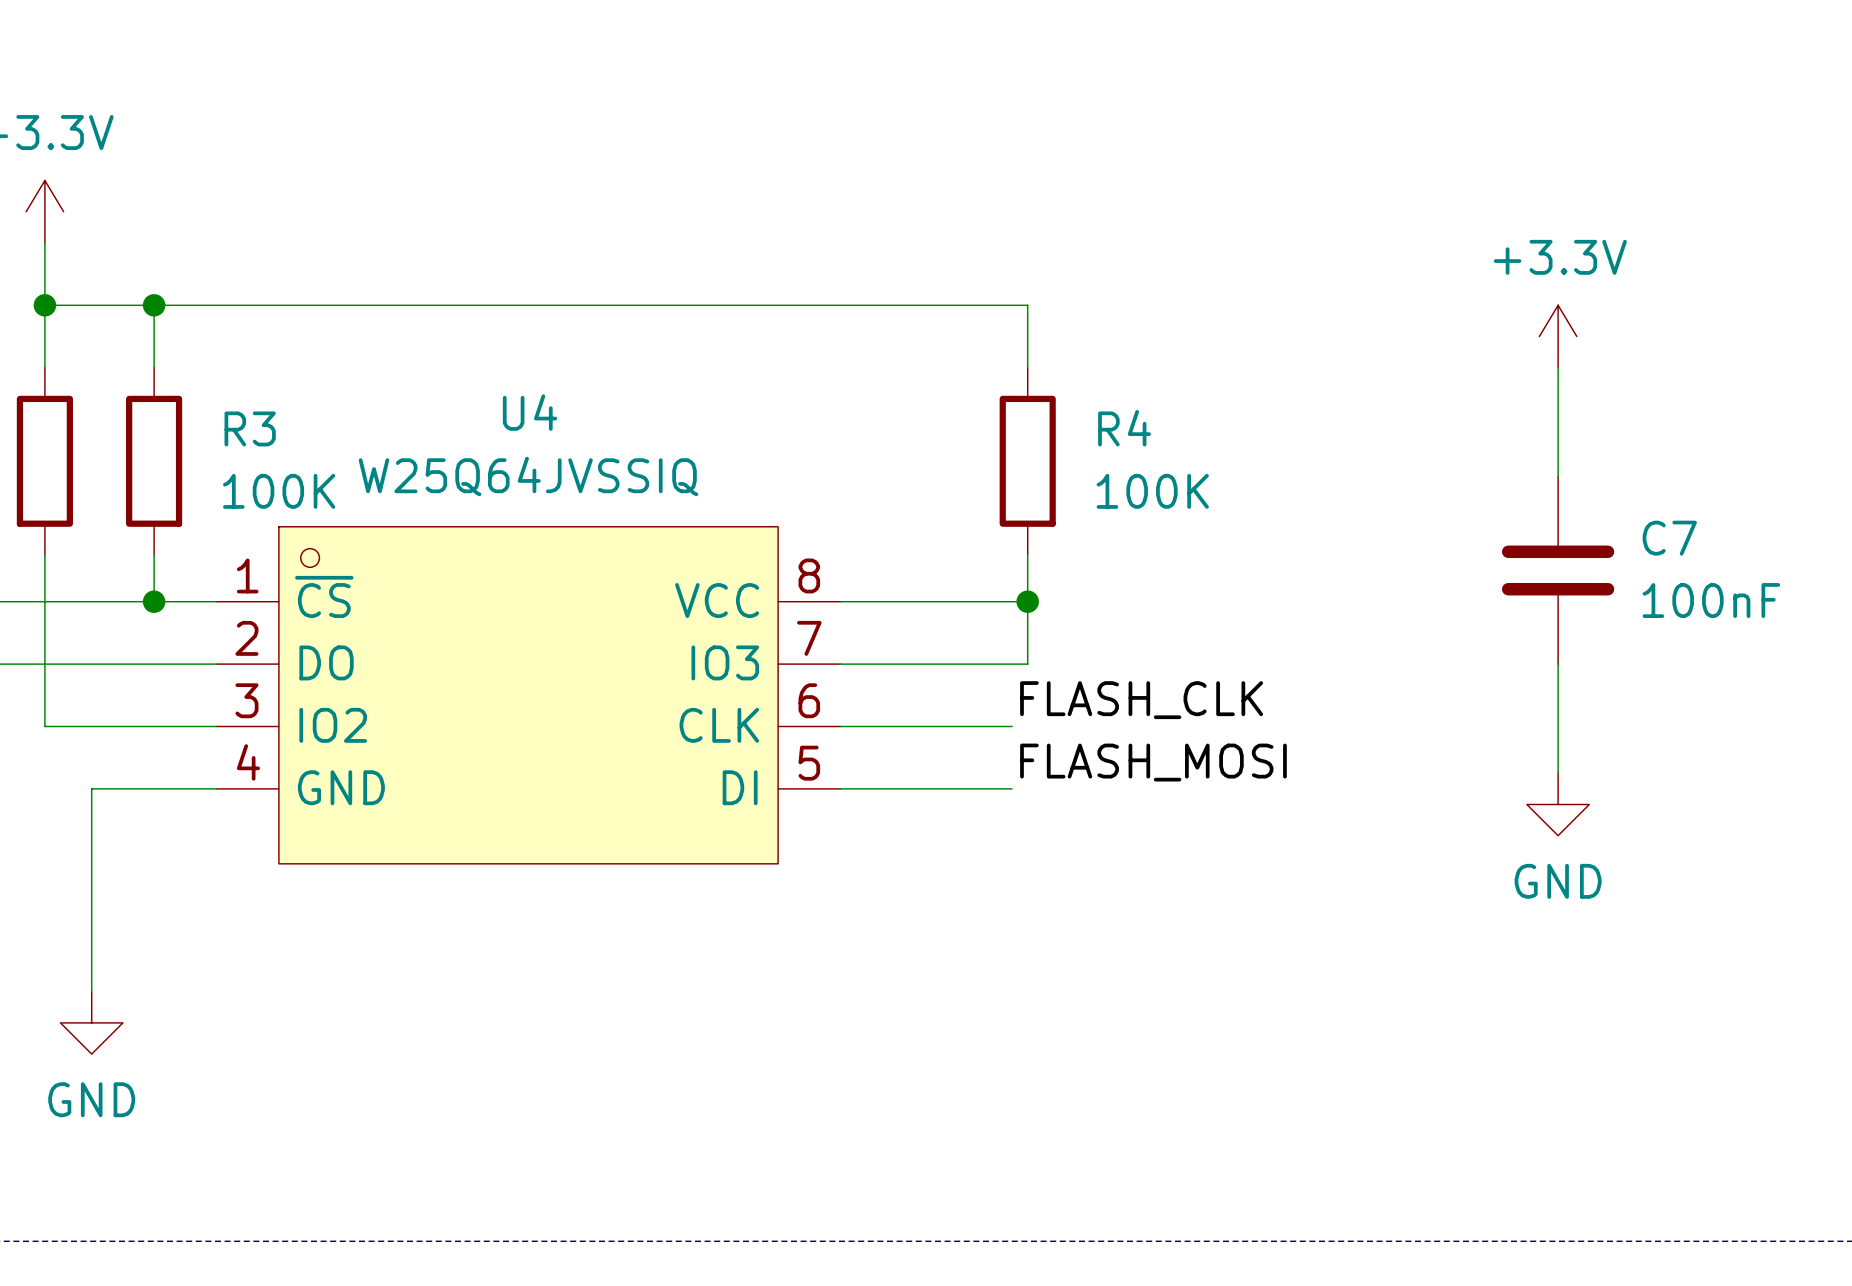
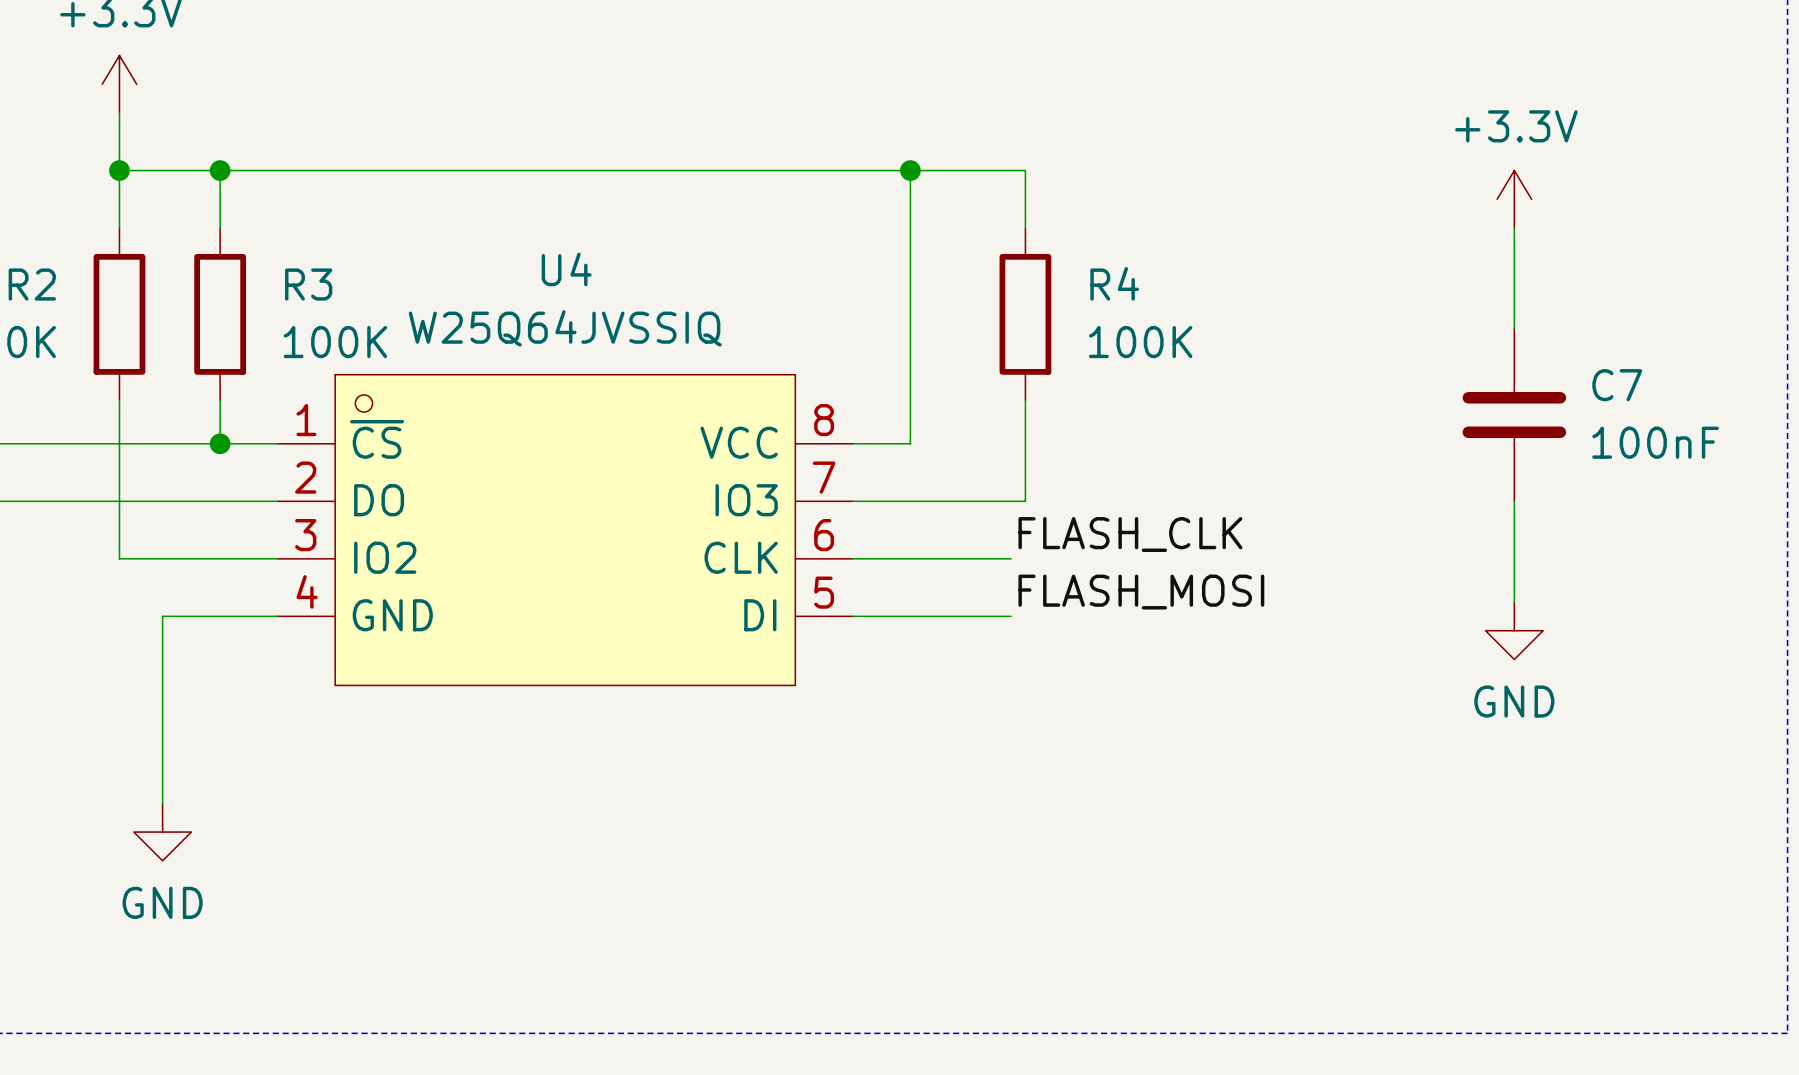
junction: none -> (910, 170)
wire: (902, 601) (1027, 601) -> (910, 443) (910, 170)
junction: (1027, 601) -> none

